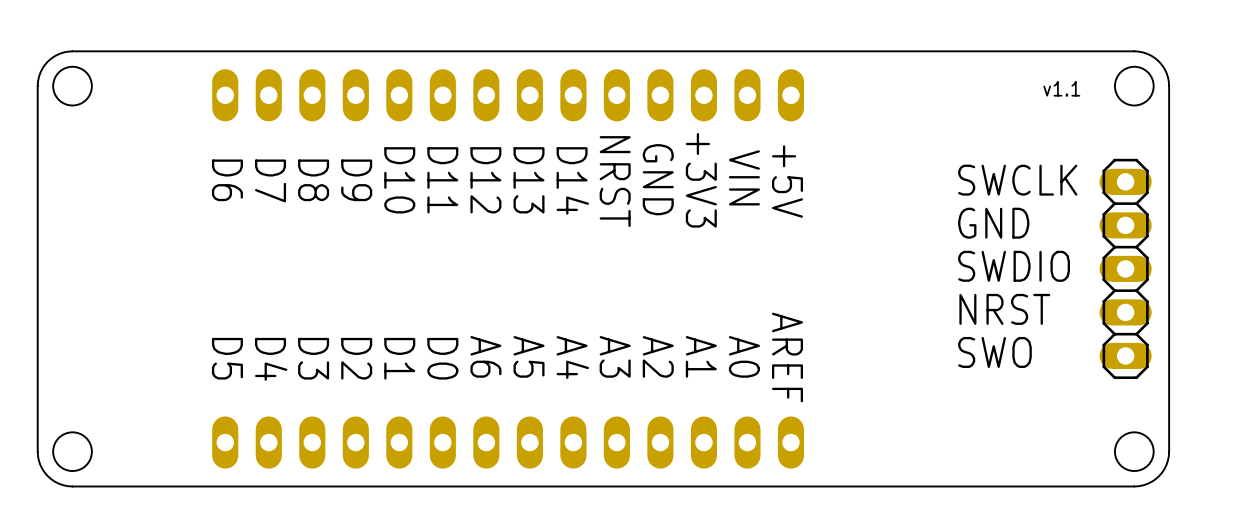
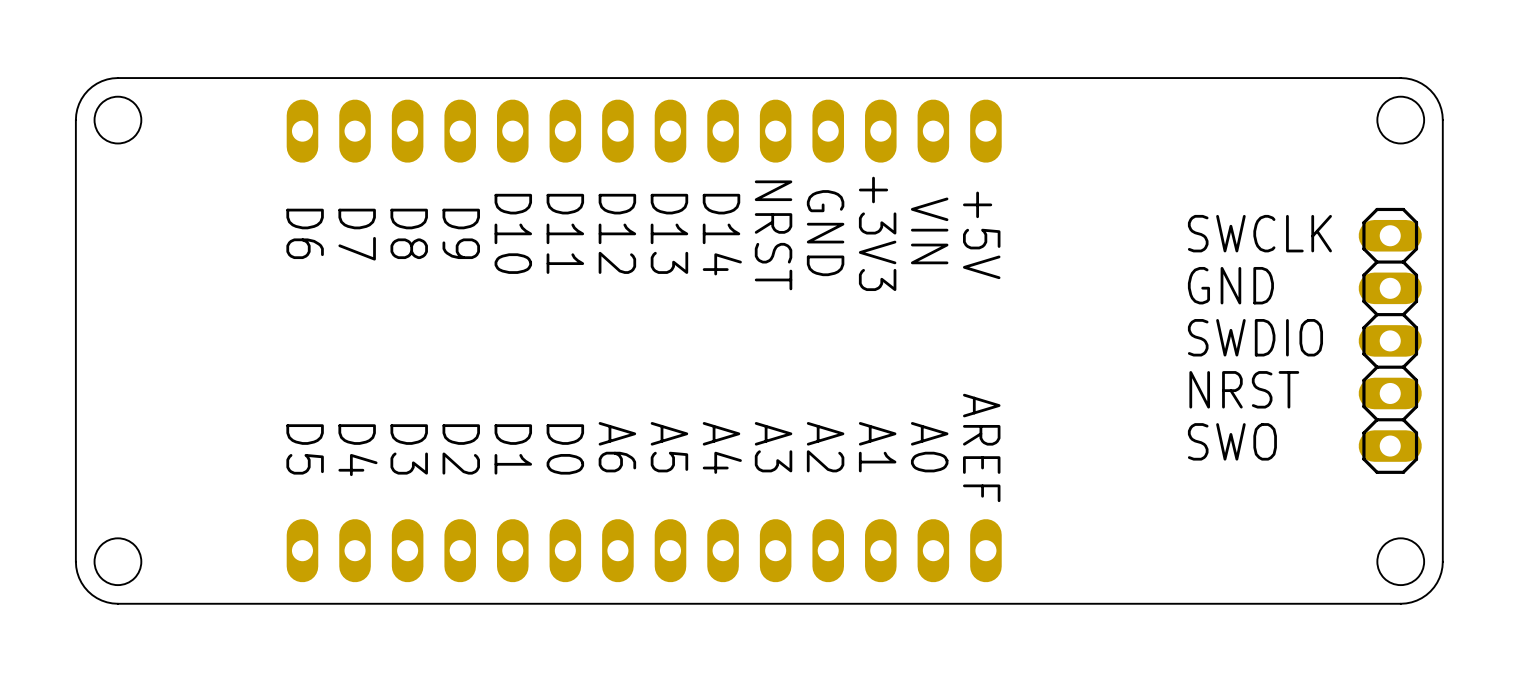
text: v1.1 (1061, 88) -> none

